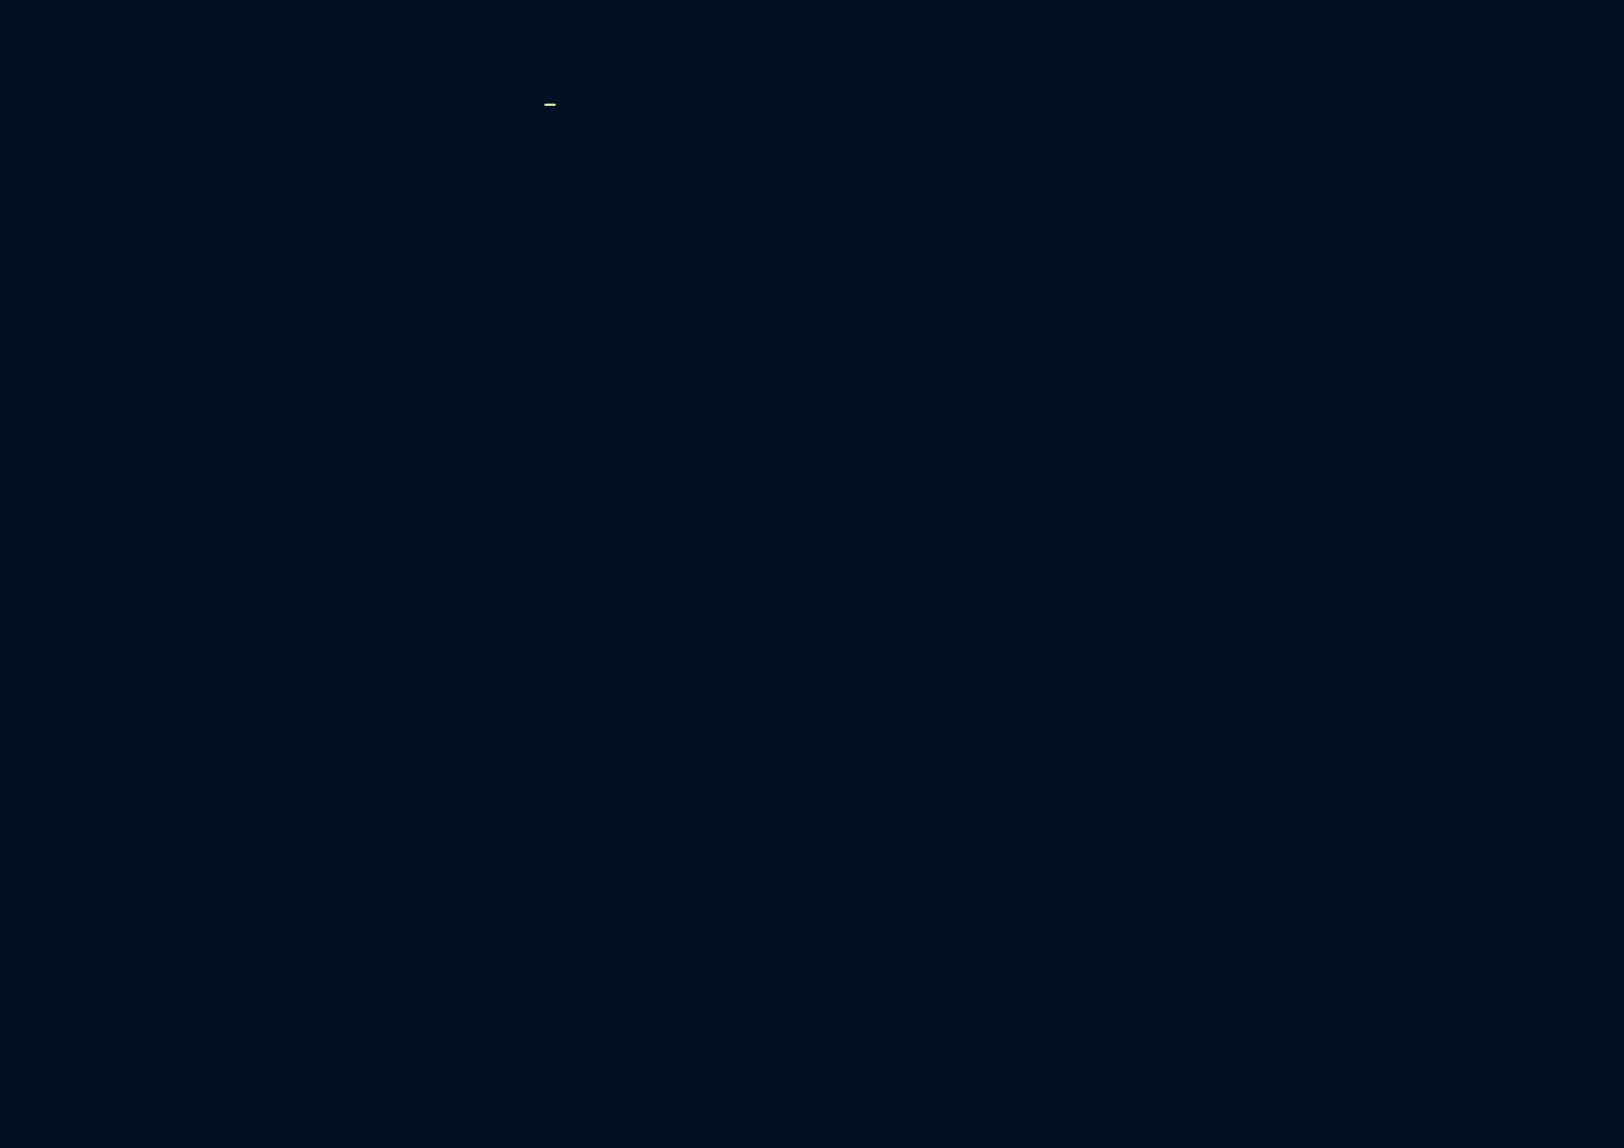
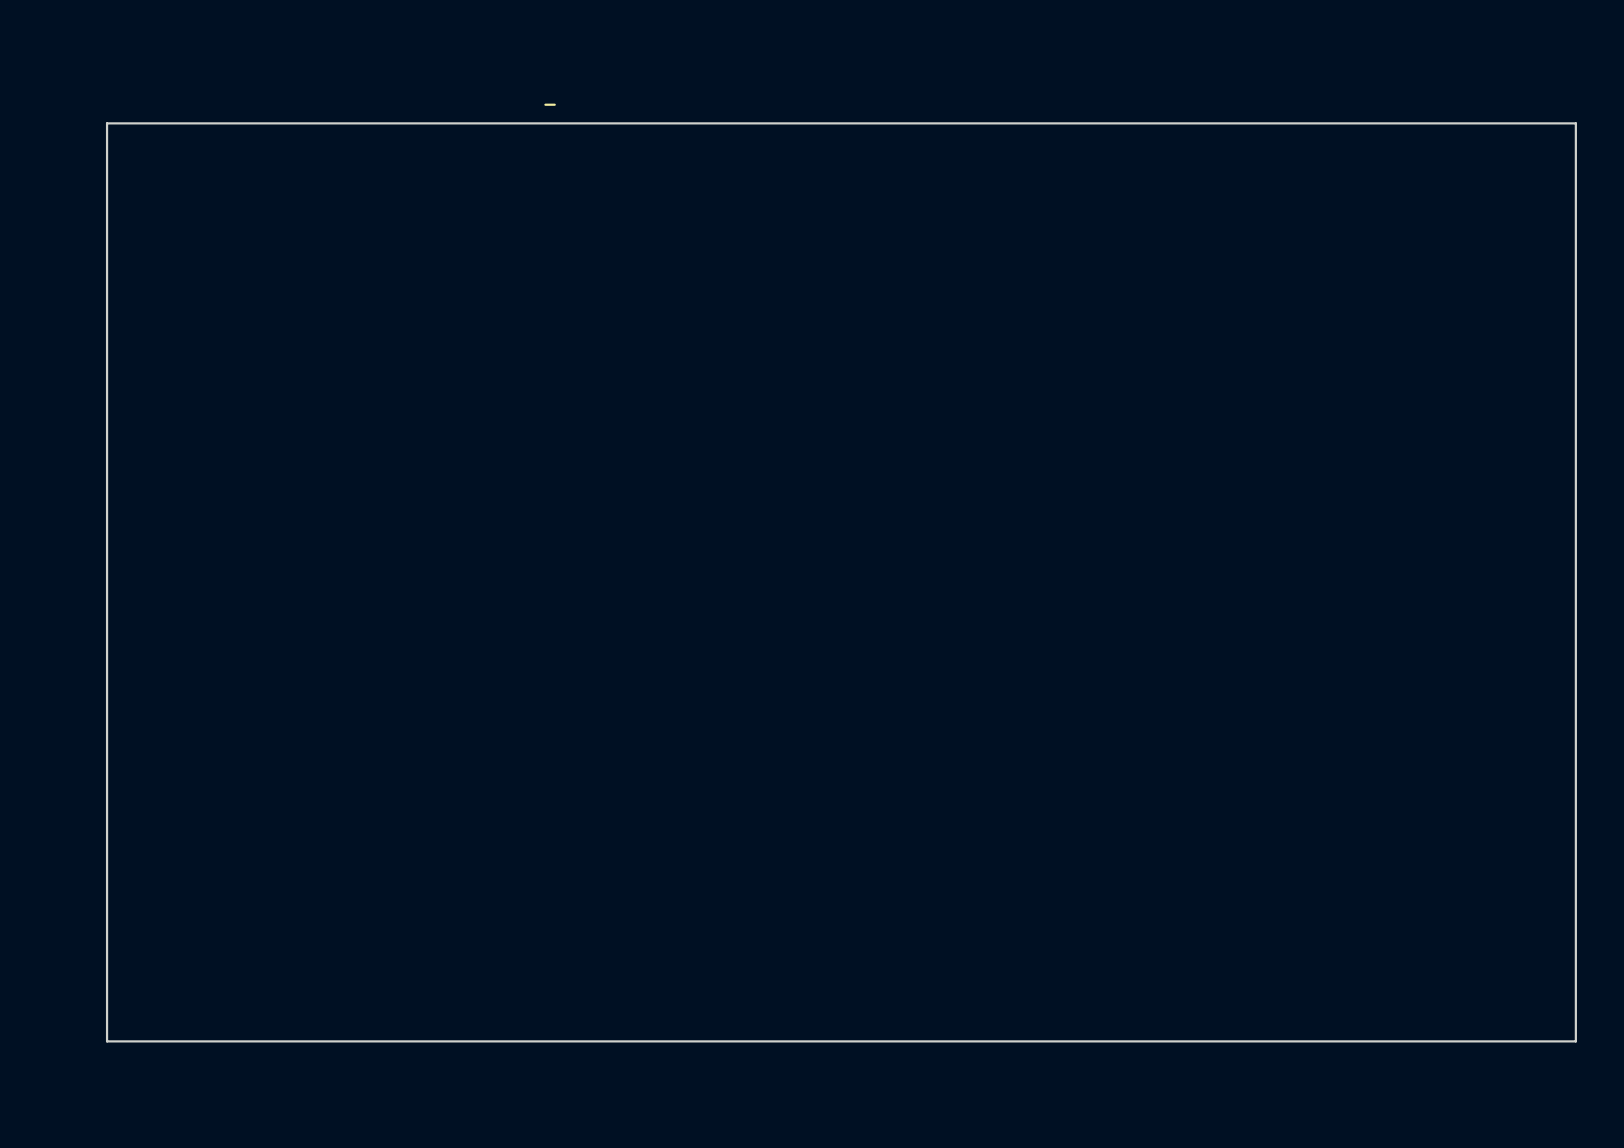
board edge: none -> (107, 123) (107, 1041) (1575, 1041) (1575, 123) (107, 123)

